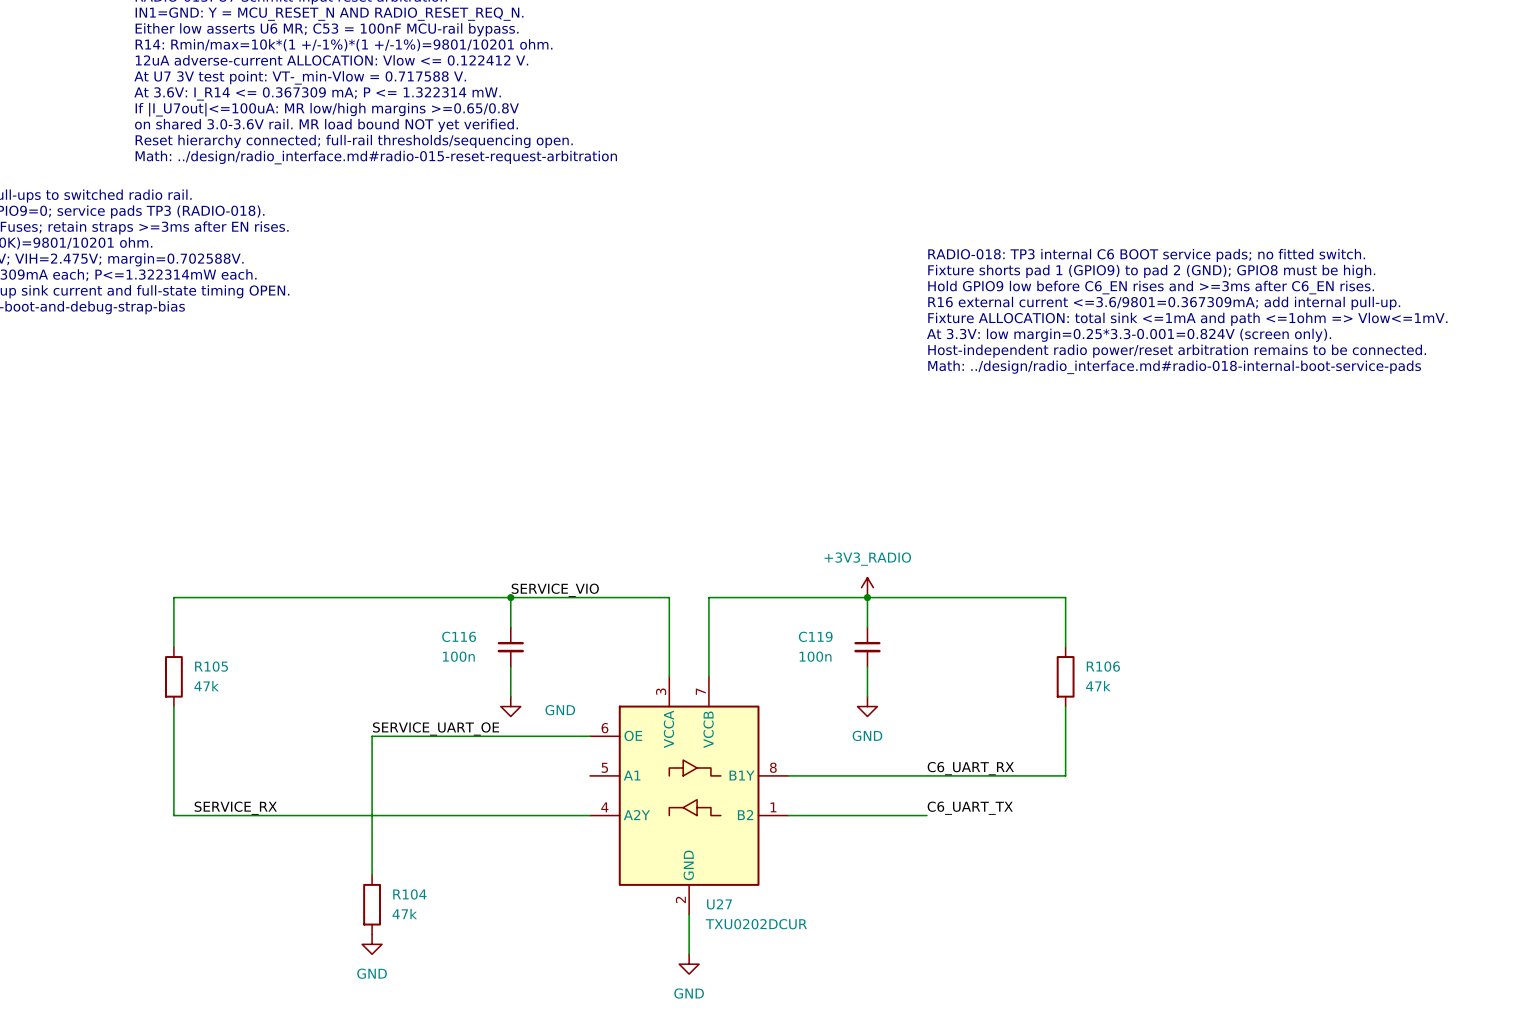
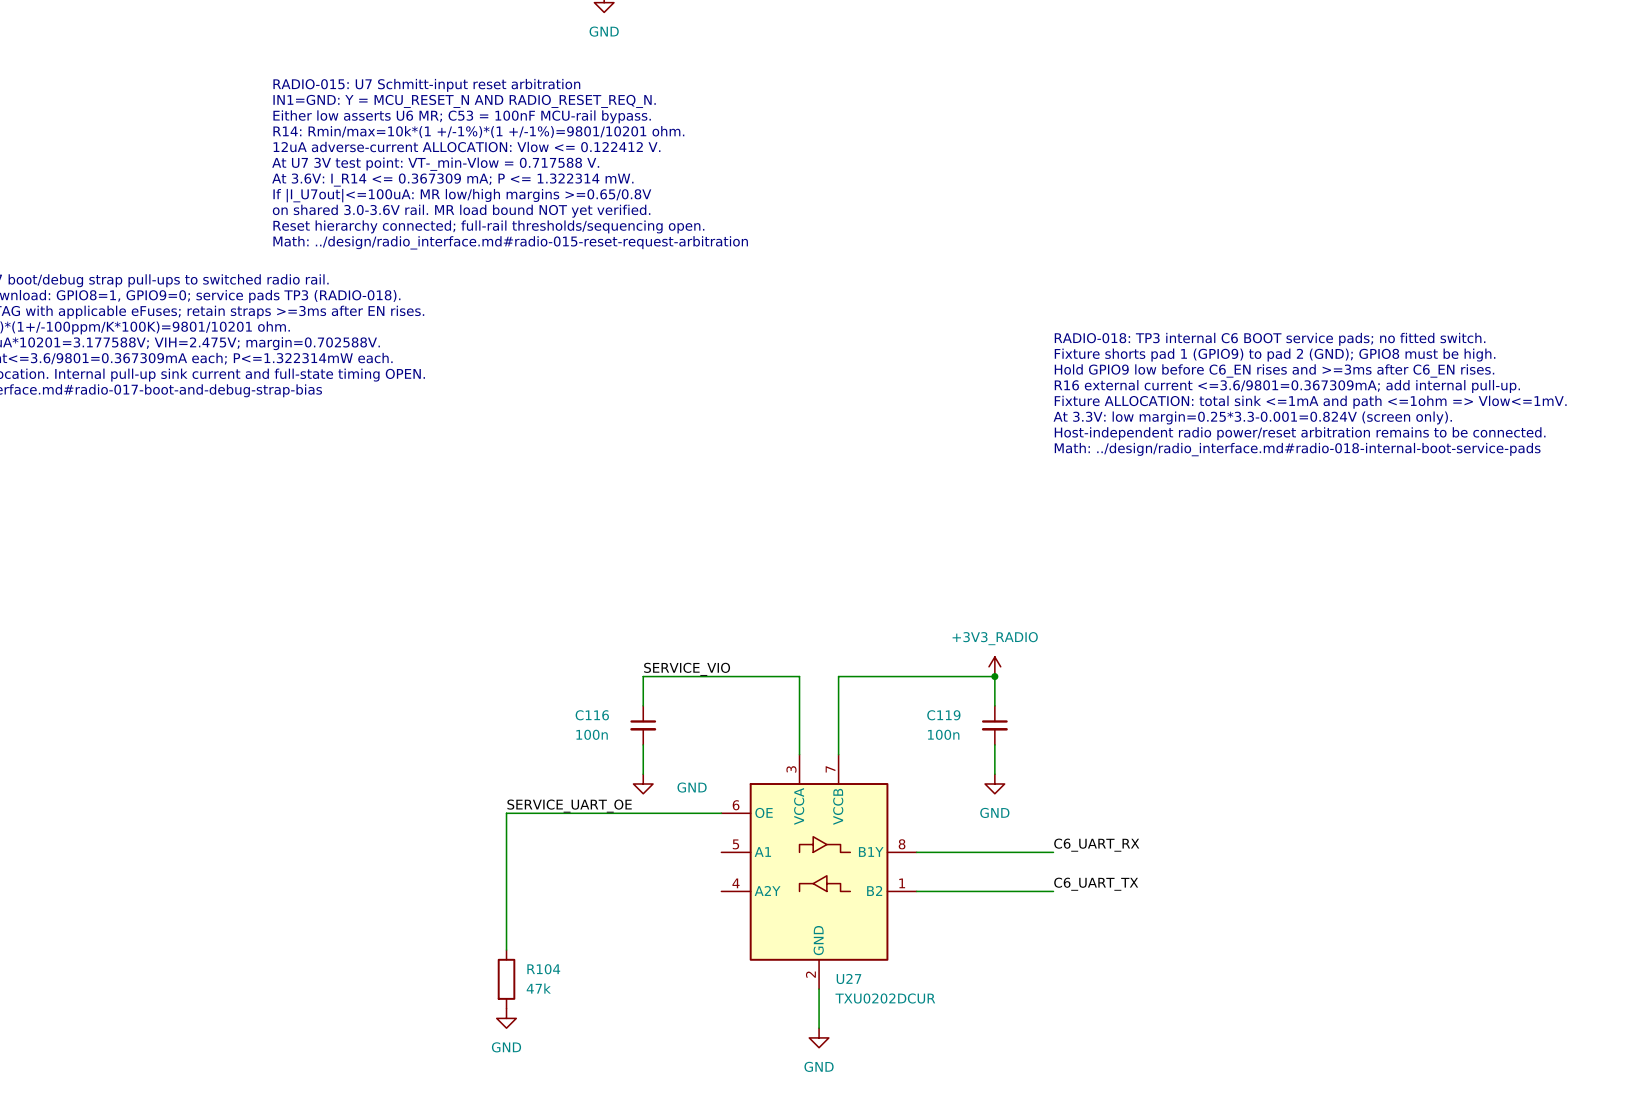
wire: (510, 597) (173, 597) (173, 647) -> none
junction: (510, 597) -> none
wire: (867, 597) (1065, 597) (1065, 647) -> none
R105: 47k (173, 676) -> none
R106: 47k (1065, 676) -> none
wire: (173, 706) (173, 815) (590, 815) -> none
wire: (1065, 706) (1065, 775) (926, 775) -> none
label: SERVICE_RX (235, 808) -> none

